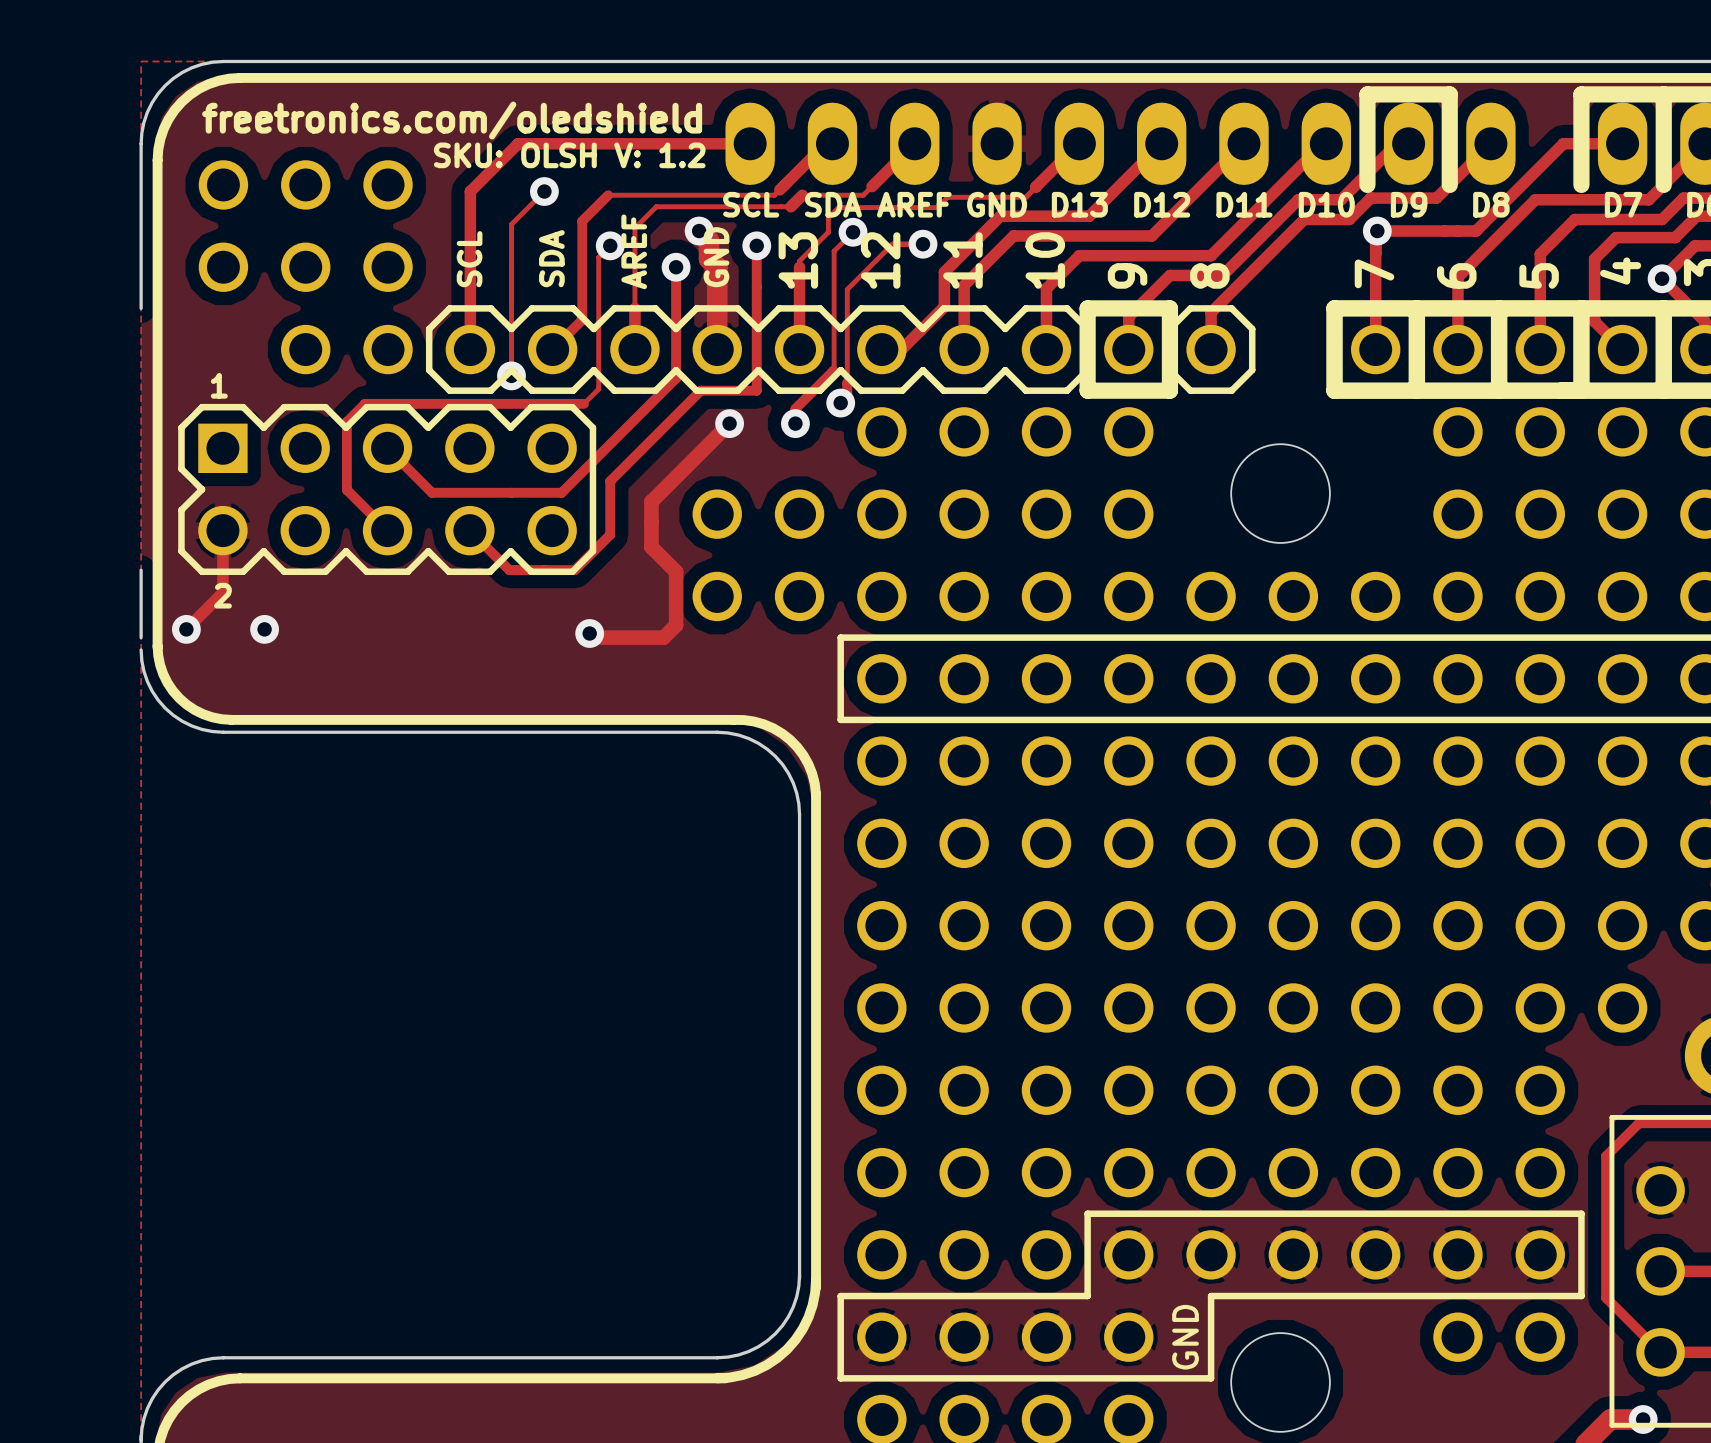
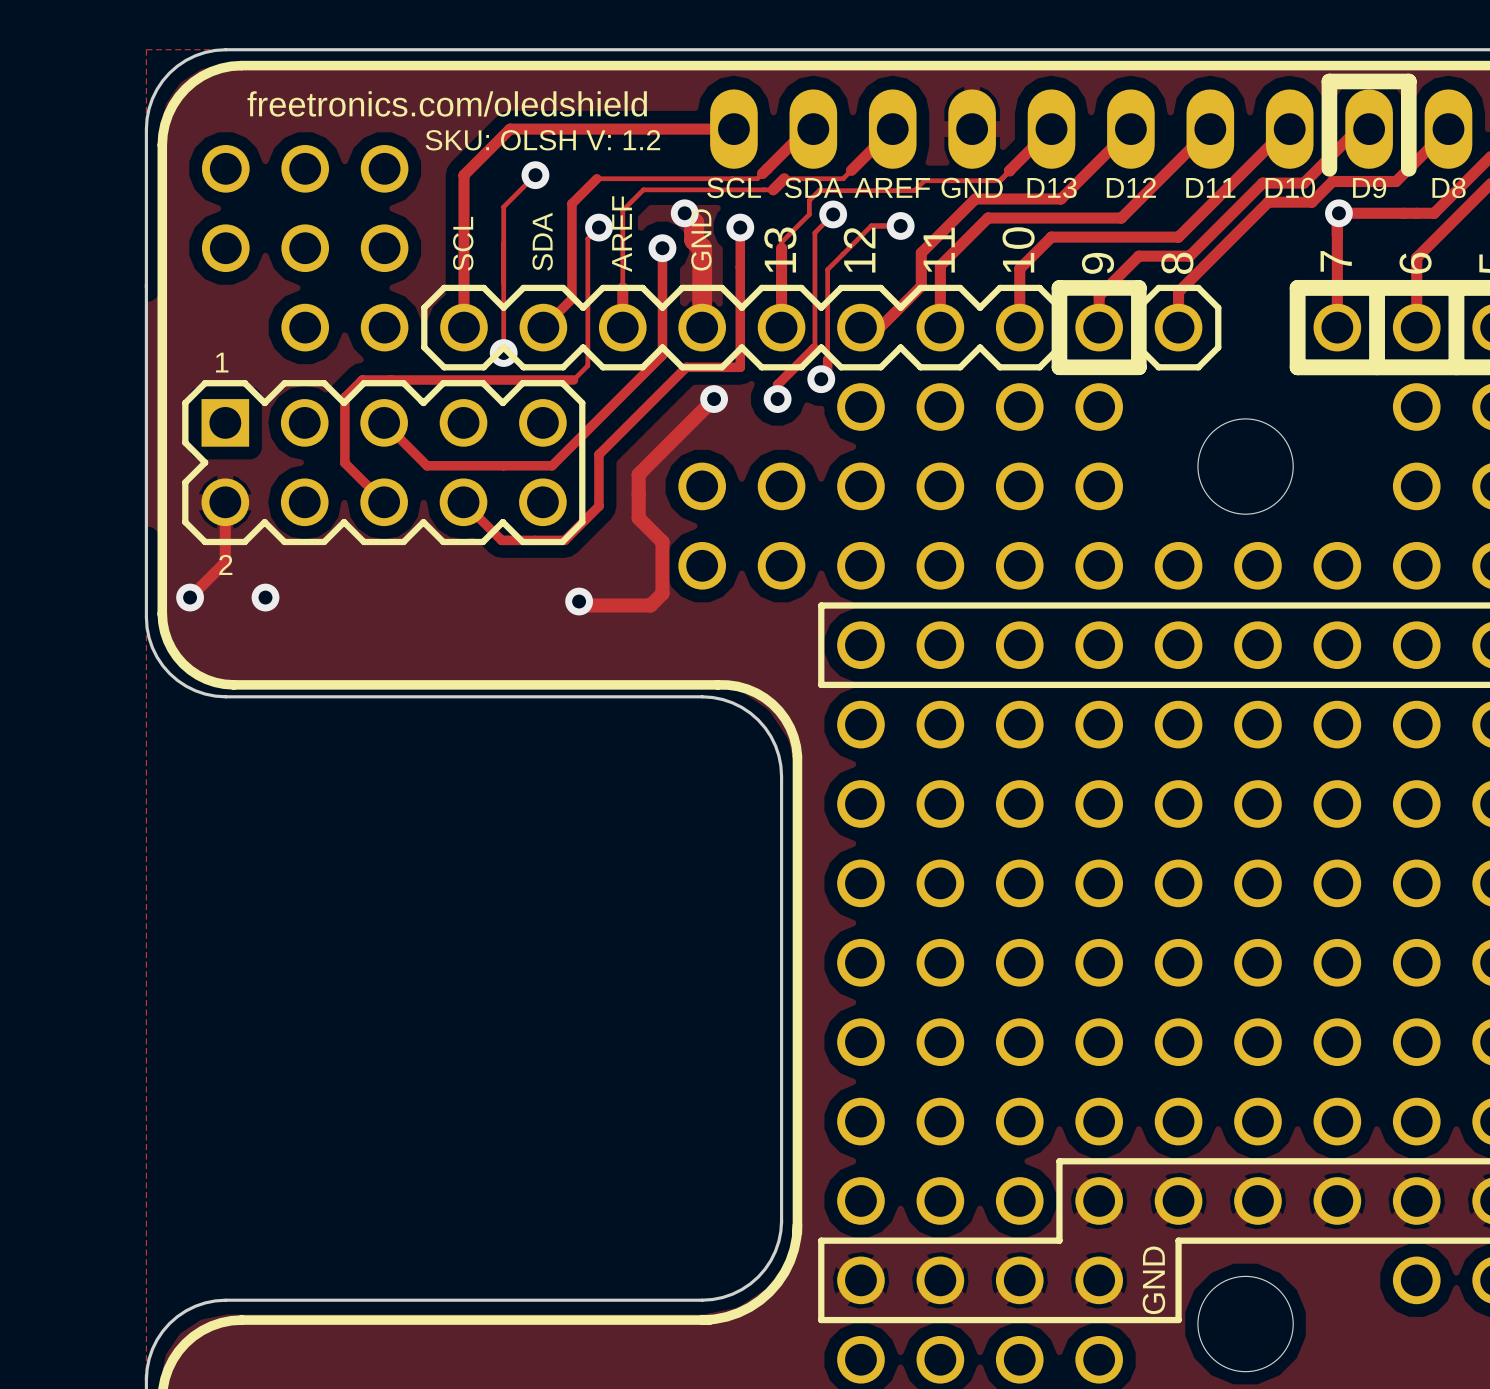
board edge: none -> (146, 287) (146, 540)
board edge: none -> (146, 605) (146, 617)

